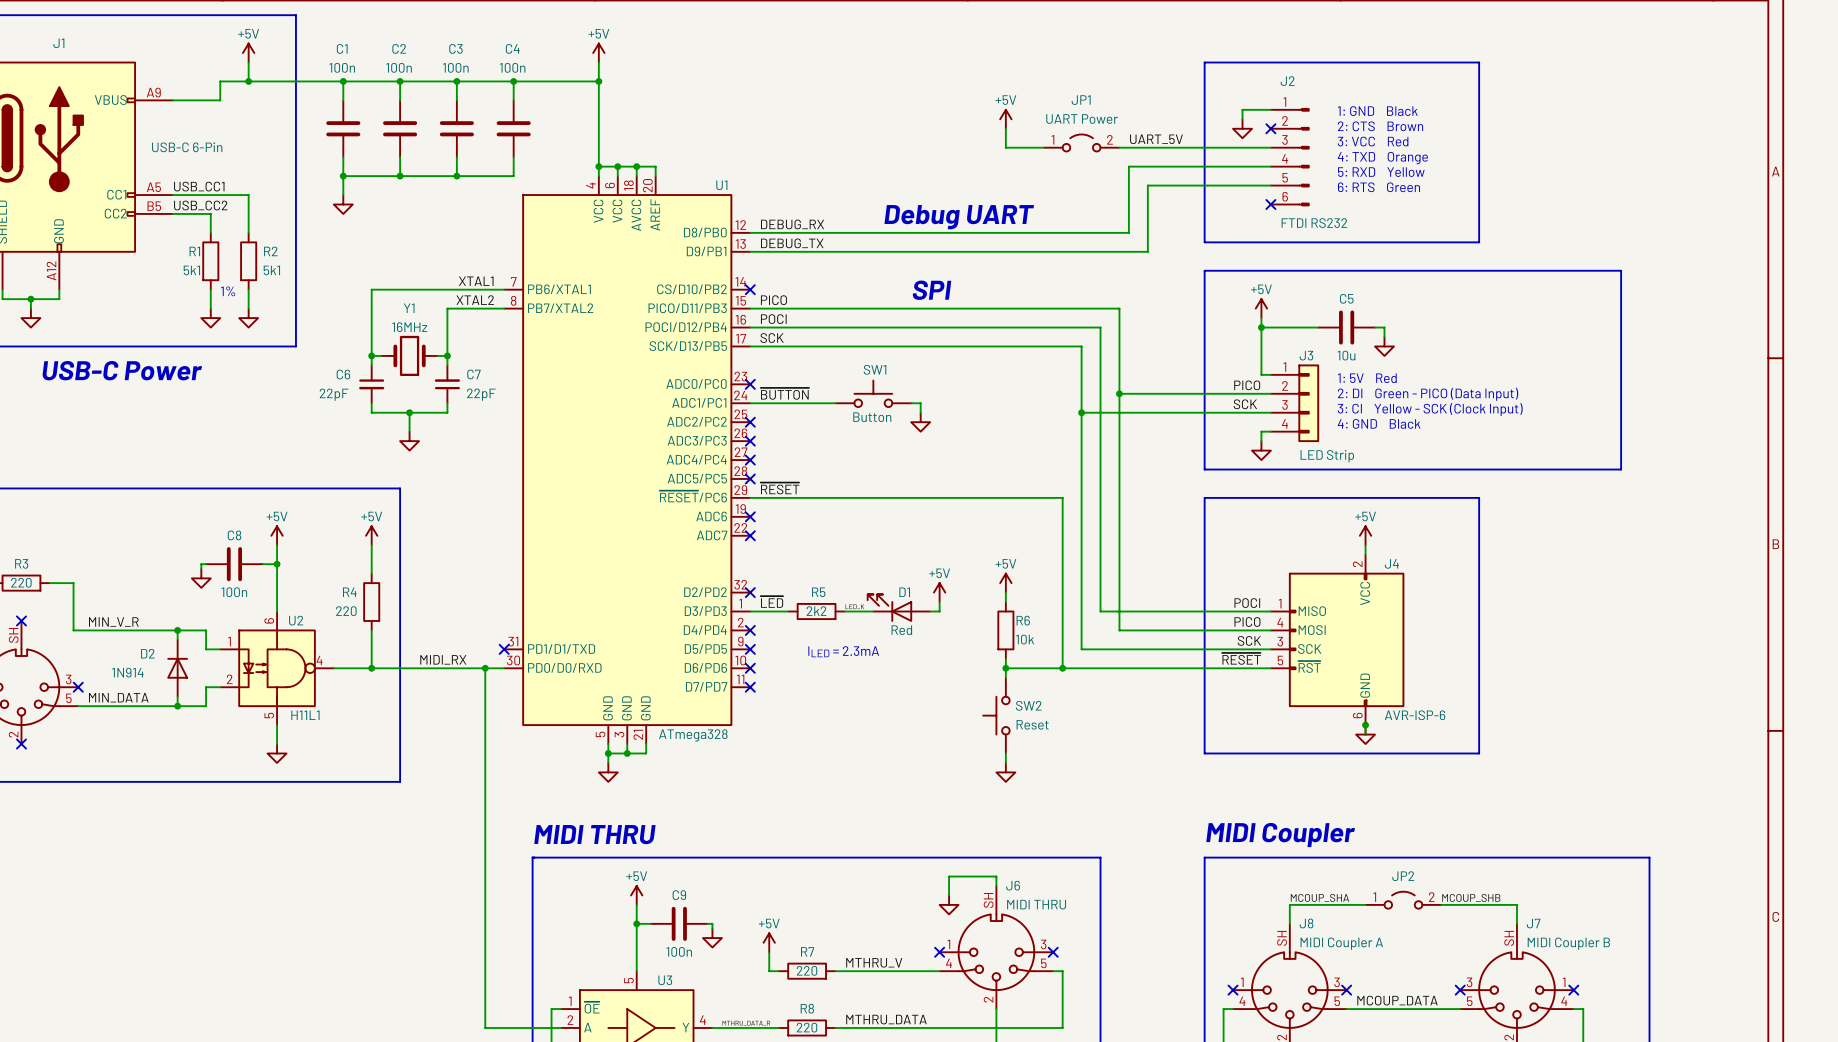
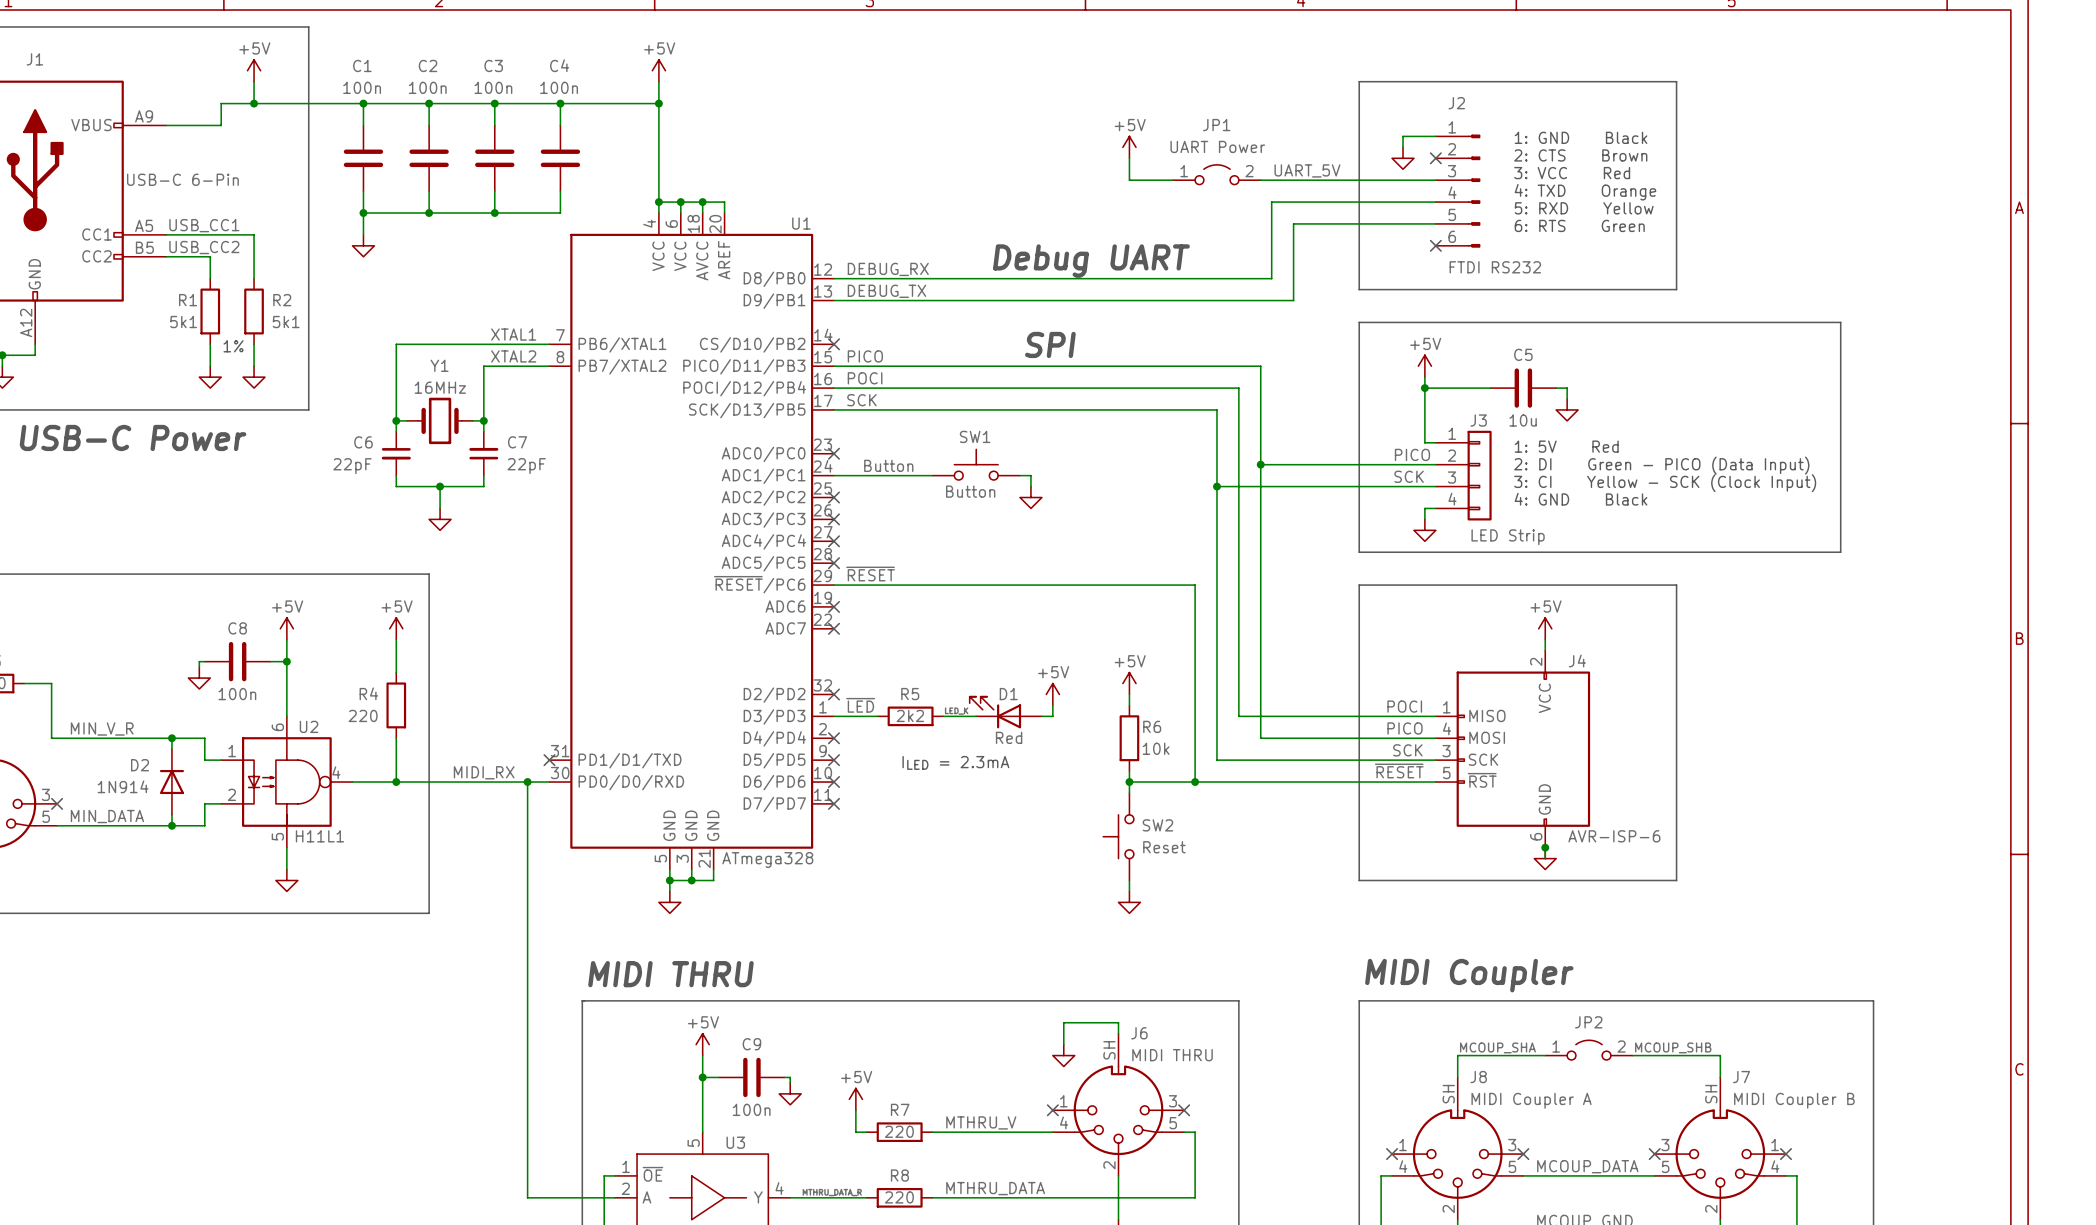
label: ~{BUTTON} (784, 393) -> none
label: none -> Button (888, 465)

